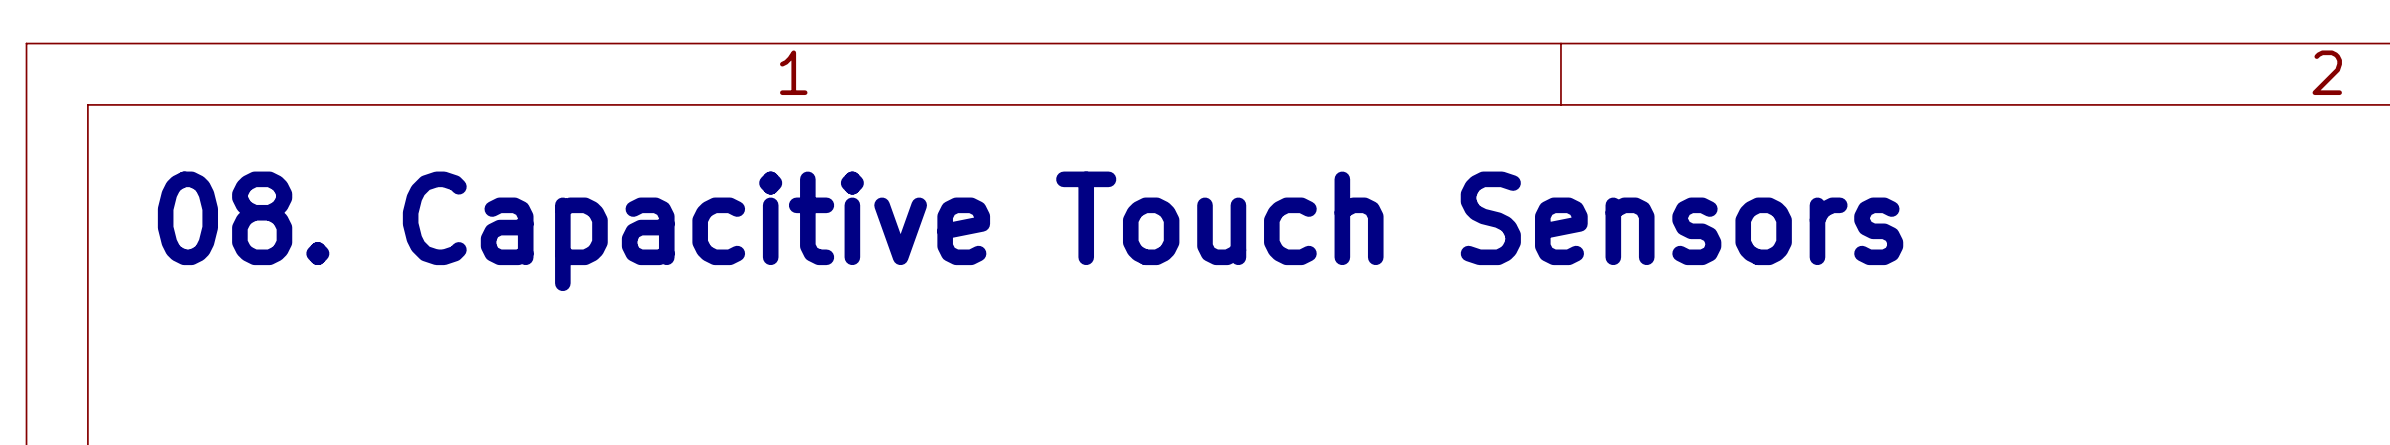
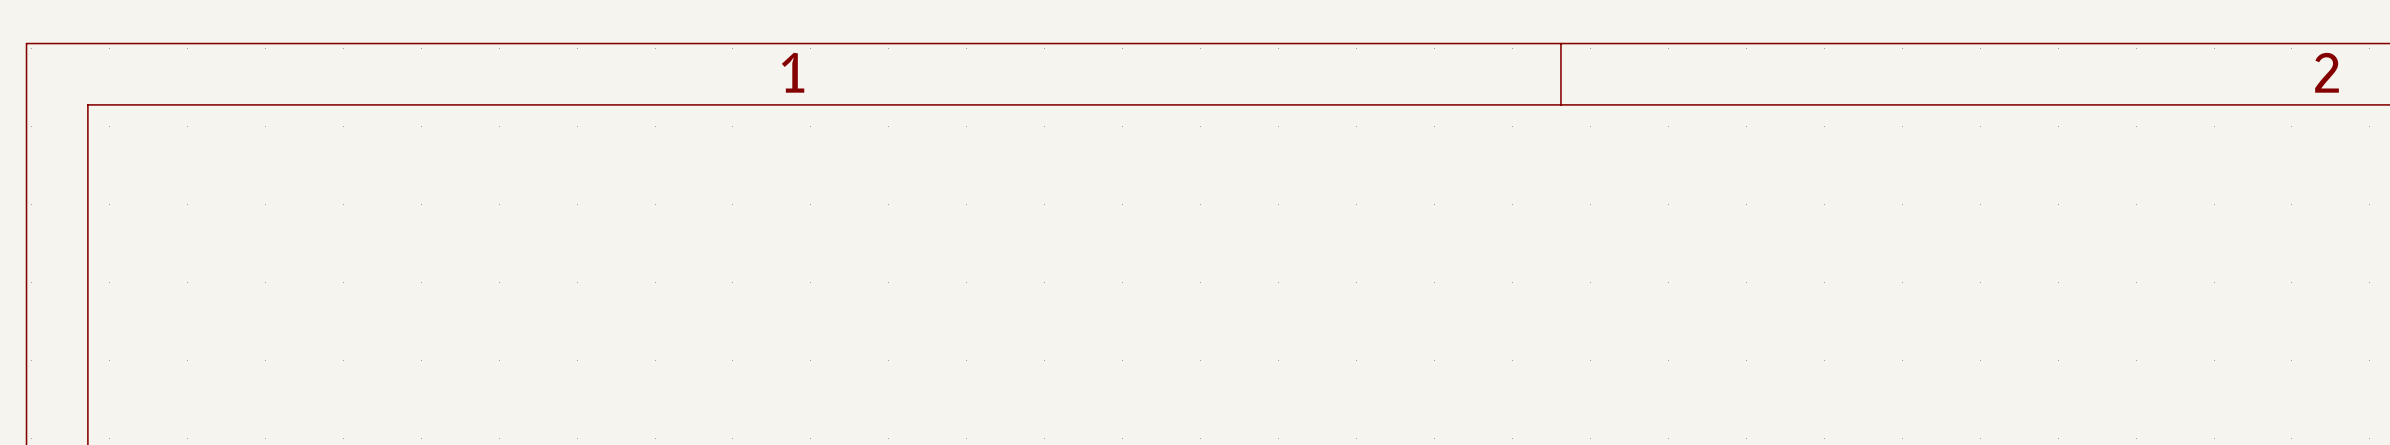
text: 08. Capacitive Touch Sensors (1030, 231) -> none

